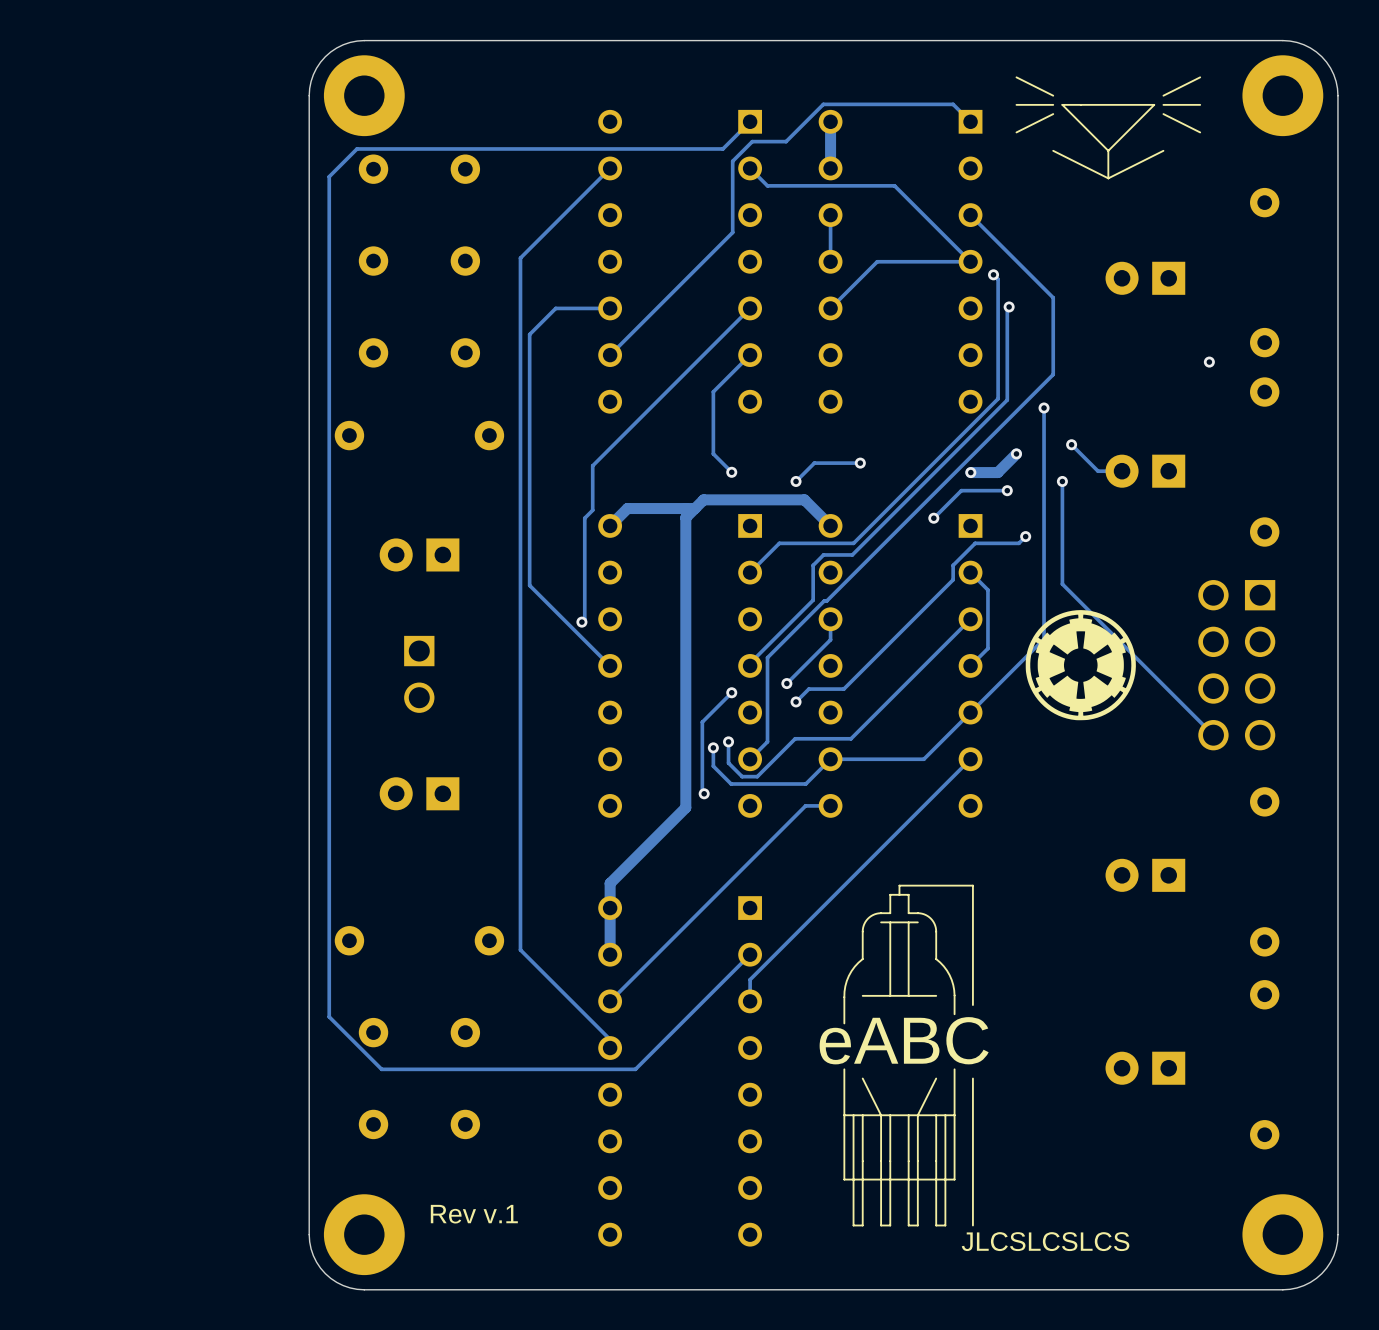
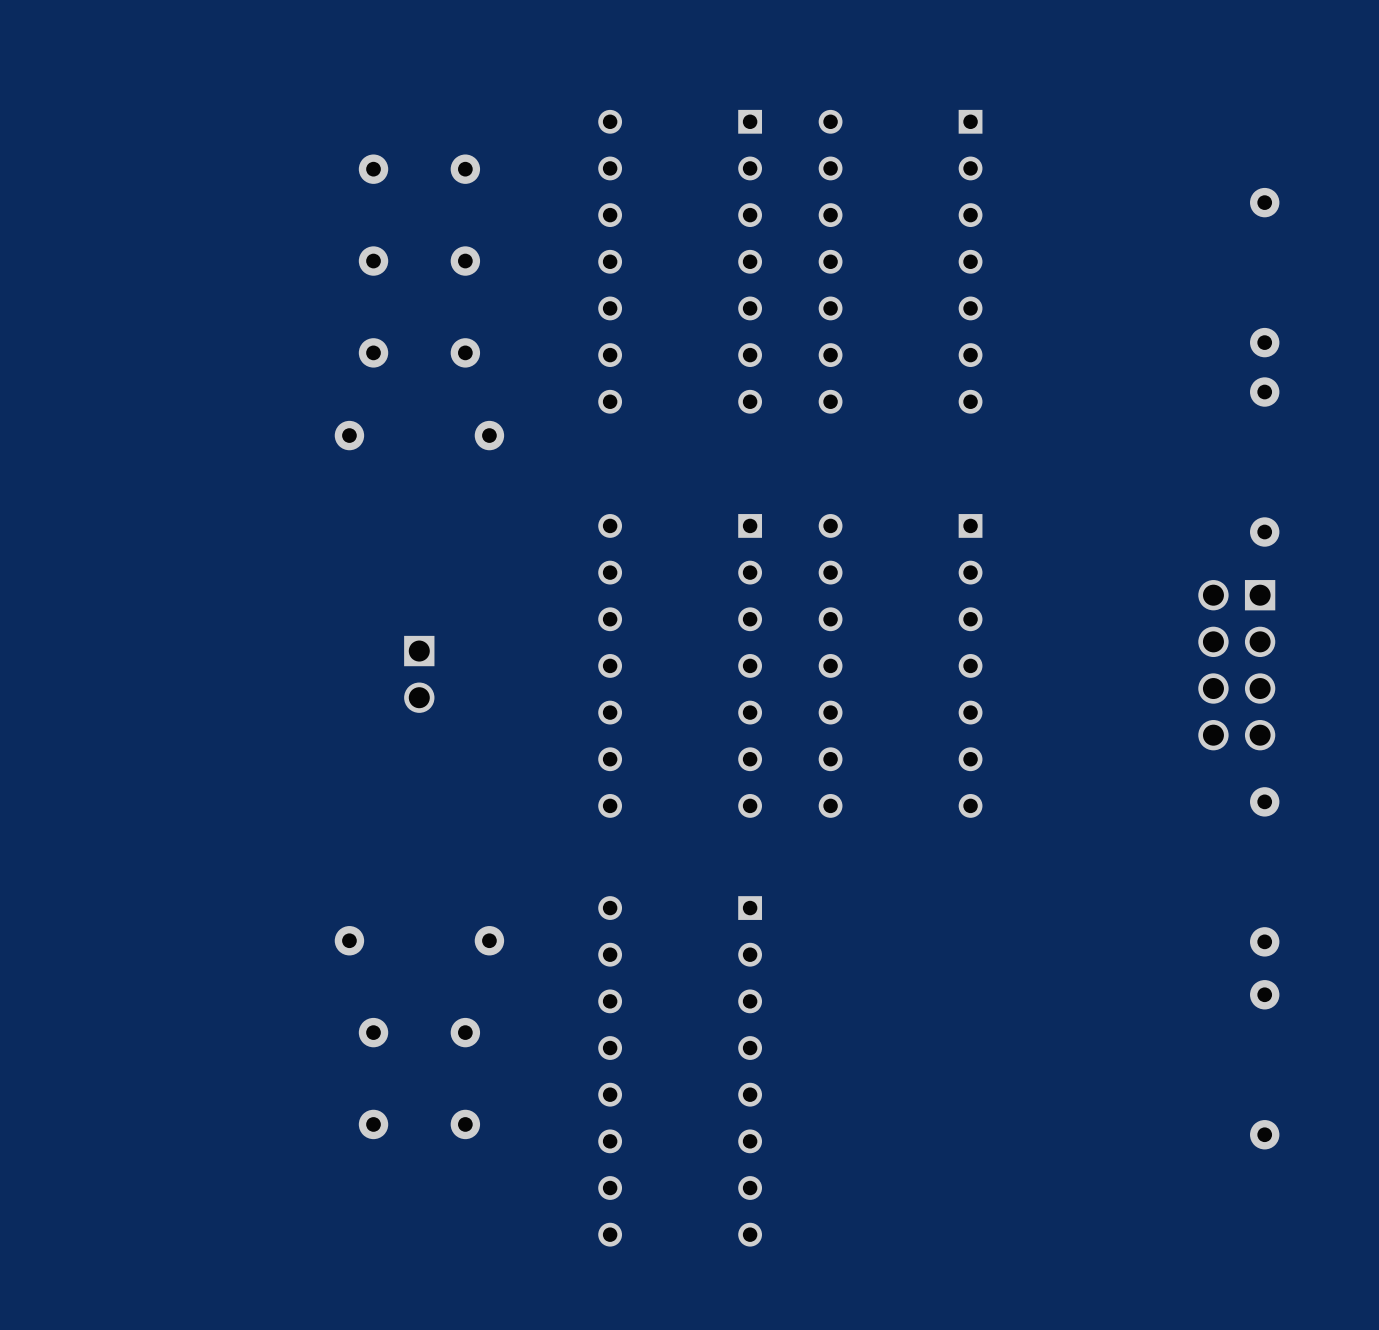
board edge: (1282, 40) (364, 40) (343, 44) (330, 51) (320, 62) (313, 74) (309, 95) (309, 1234) (313, 1255) (320, 1268) (330, 1278) (350, 1287) (364, 1289) (1282, 1289) (1297, 1287) (1310, 1282) (1326, 1268) (1336, 1248) (1337, 1234) (1337, 95) (1333, 74) (1321, 56) (1303, 44) (1282, 40) -> none
drawing: [1015, 76, 1202, 180] -> none
part: (364, 95) -> none
part: (1282, 95) -> none
track: (750, 121) (722, 148) (356, 148) (329, 176) (329, 1016) (381, 1069) (635, 1069) (750, 954) -> none
track: (830, 121) (830, 168) -> none
track: (970, 121) (953, 104) (823, 104) (786, 141) (752, 141) (732, 161) (732, 232) (610, 355) -> none
track: (610, 168) (520, 258) (520, 949) (610, 1039) (610, 1048) -> none
track: (750, 168) (767, 185) (894, 185) (970, 261) (877, 261) (830, 308) -> none
track: (830, 215) (830, 261) -> none
track: (970, 215) (1053, 297) (1053, 374) (767, 657) (767, 741) (750, 759) -> none
track: (993, 274) (998, 279) (998, 398) (853, 543) (779, 543) (750, 572) -> none
via: (993, 274) -> none
part: (1145, 278) -> none
track: (1009, 306) (1007, 308) (1007, 400) (852, 554) (823, 554) (813, 565) (813, 600) (750, 663) (750, 665) -> none
via: (1009, 306) -> none
track: (610, 308) (555, 308) (529, 334) (529, 585) (610, 665) -> none
track: (750, 308) (592, 465) (592, 510) (584, 518) (584, 619) (581, 622) -> none
track: (750, 355) (713, 391) (713, 453) (731, 472) -> none
via: (1209, 362) -> none
track: (1044, 408) (1044, 639) (923, 759) (830, 759) (805, 784) (731, 784) (713, 766) (713, 747) -> none
via: (1044, 408) -> none
track: (1071, 444) (1098, 471) (1122, 471) -> none
via: (1071, 444) -> none
track: (1016, 453) (997, 472) (970, 472) -> none
via: (1016, 453) -> none
track: (860, 463) (814, 463) (796, 481) -> none
via: (860, 463) -> none
part: (1145, 471) -> none
via: (731, 472) -> none
via: (970, 472) -> none
via: (796, 481) -> none
track: (1062, 481) (1062, 584) (1213, 735) -> none
via: (1062, 481) -> none
track: (1007, 490) (961, 490) (933, 518) -> none
via: (1007, 490) -> none
track: (694, 508) (627, 508) (610, 525) -> none
via: (933, 518) -> none
track: (830, 525) (804, 499) (703, 499) (685, 517) (685, 807) (610, 883) (610, 954) -> none
track: (1025, 536) (1018, 543) (975, 543) (953, 565) (953, 579) (843, 689) (808, 689) (796, 701) -> none
via: (1025, 536) -> none
part: (419, 554) -> none
track: (970, 572) (987, 590) (987, 648) (970, 665) -> none
drawing: [1025, 610, 1136, 721] -> none
track: (830, 619) (830, 639) (786, 683) -> none
track: (970, 619) (851, 738) (795, 738) (757, 776) (742, 776) (728, 763) (728, 741) -> none
via: (581, 622) -> none
via: (786, 683) -> none
track: (731, 692) (702, 722) (702, 791) (704, 793) -> none
via: (731, 692) -> none
via: (796, 701) -> none
via: (728, 741) -> none
via: (713, 747) -> none
track: (970, 759) (750, 979) (750, 1001) -> none
part: (419, 793) -> none
via: (704, 793) -> none
track: (830, 805) (805, 805) (610, 1001) -> none
part: (1145, 875) -> none
drawing: [843, 884, 974, 1227] -> none
part: (1145, 1068) -> none
text: Rev v.1 (474, 1214) -> none
part: (364, 1234) -> none
part: (1282, 1234) -> none
text: JLCSLCSLCS (1045, 1241) -> none

